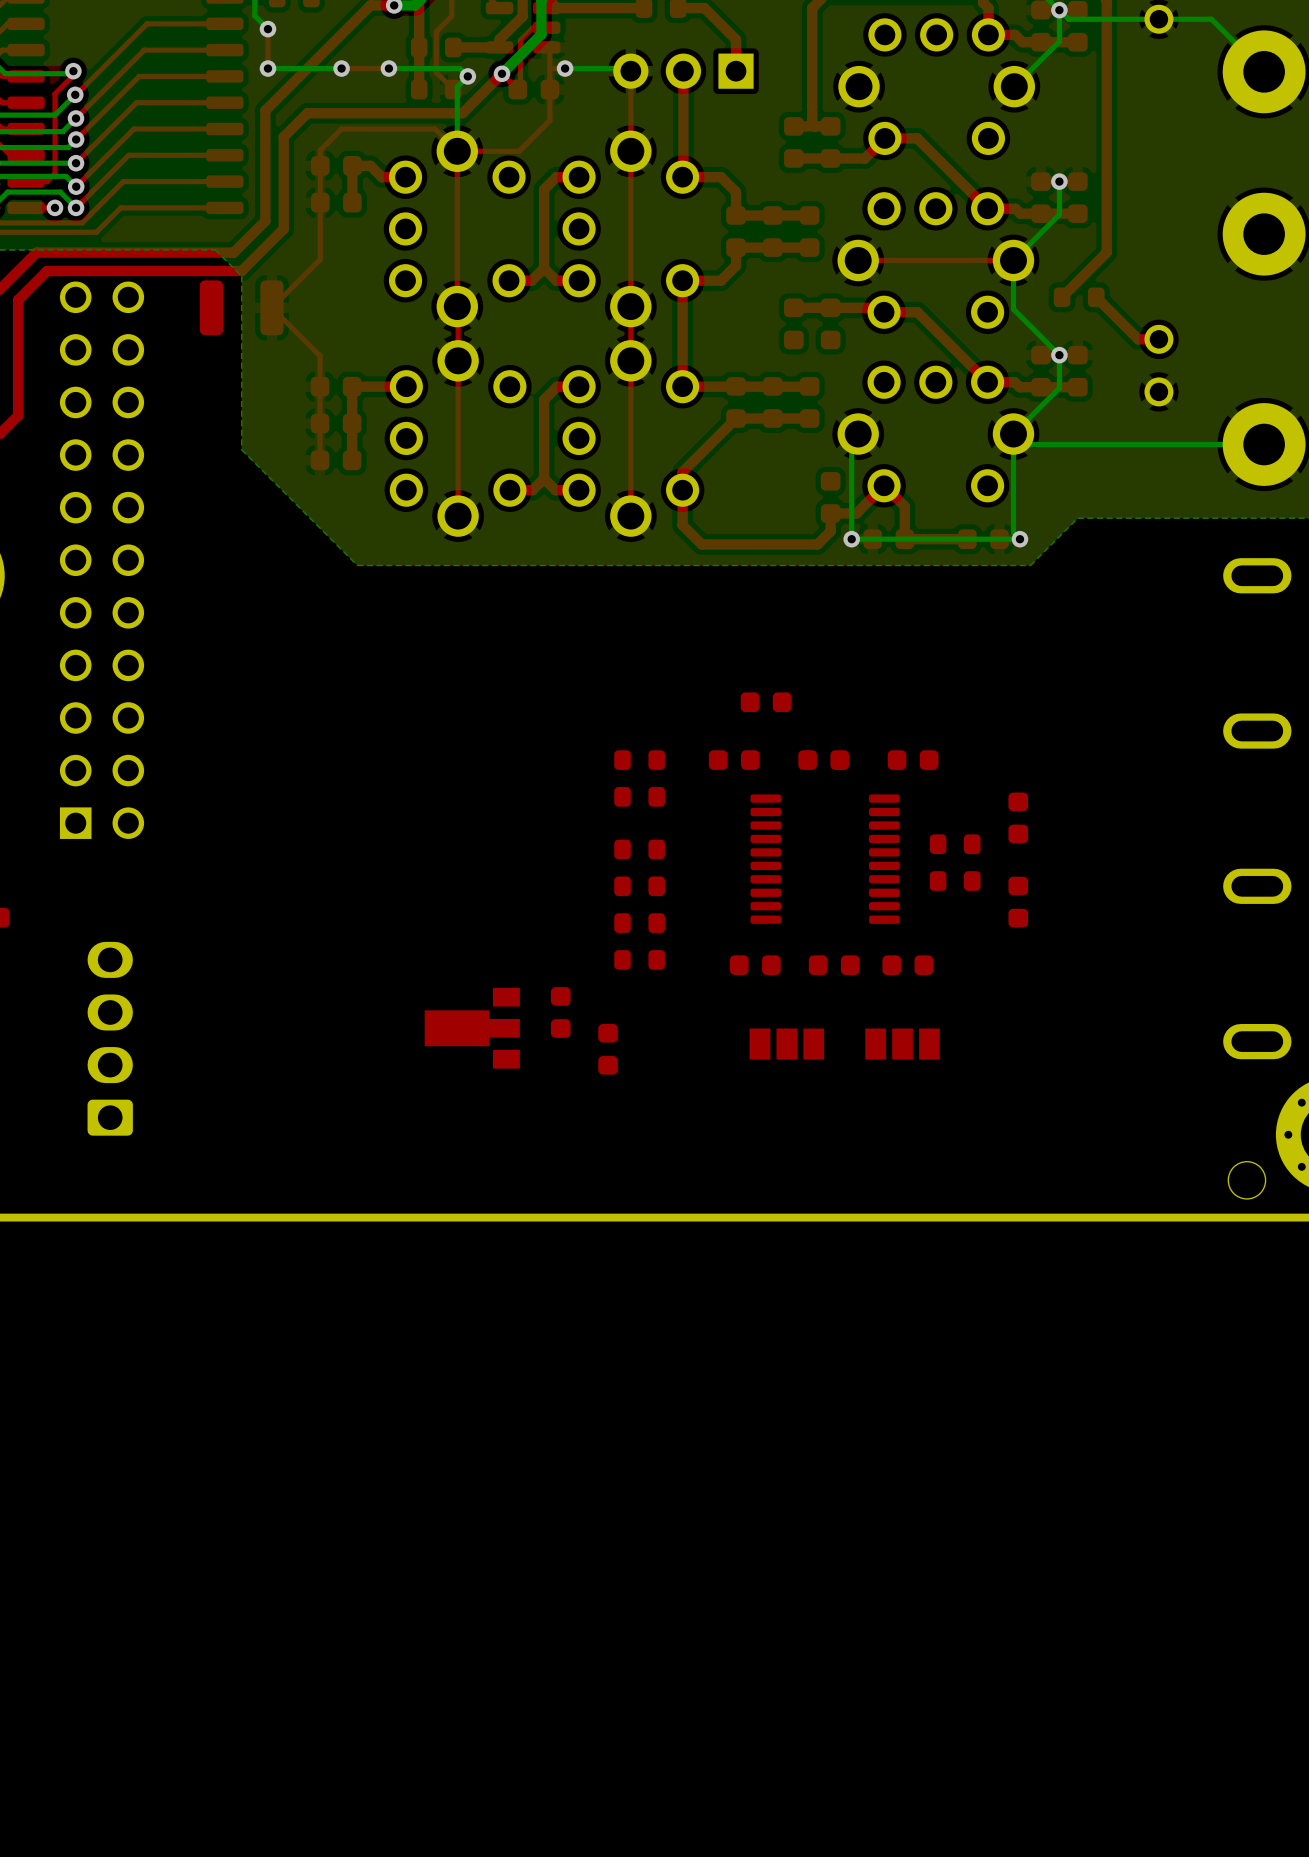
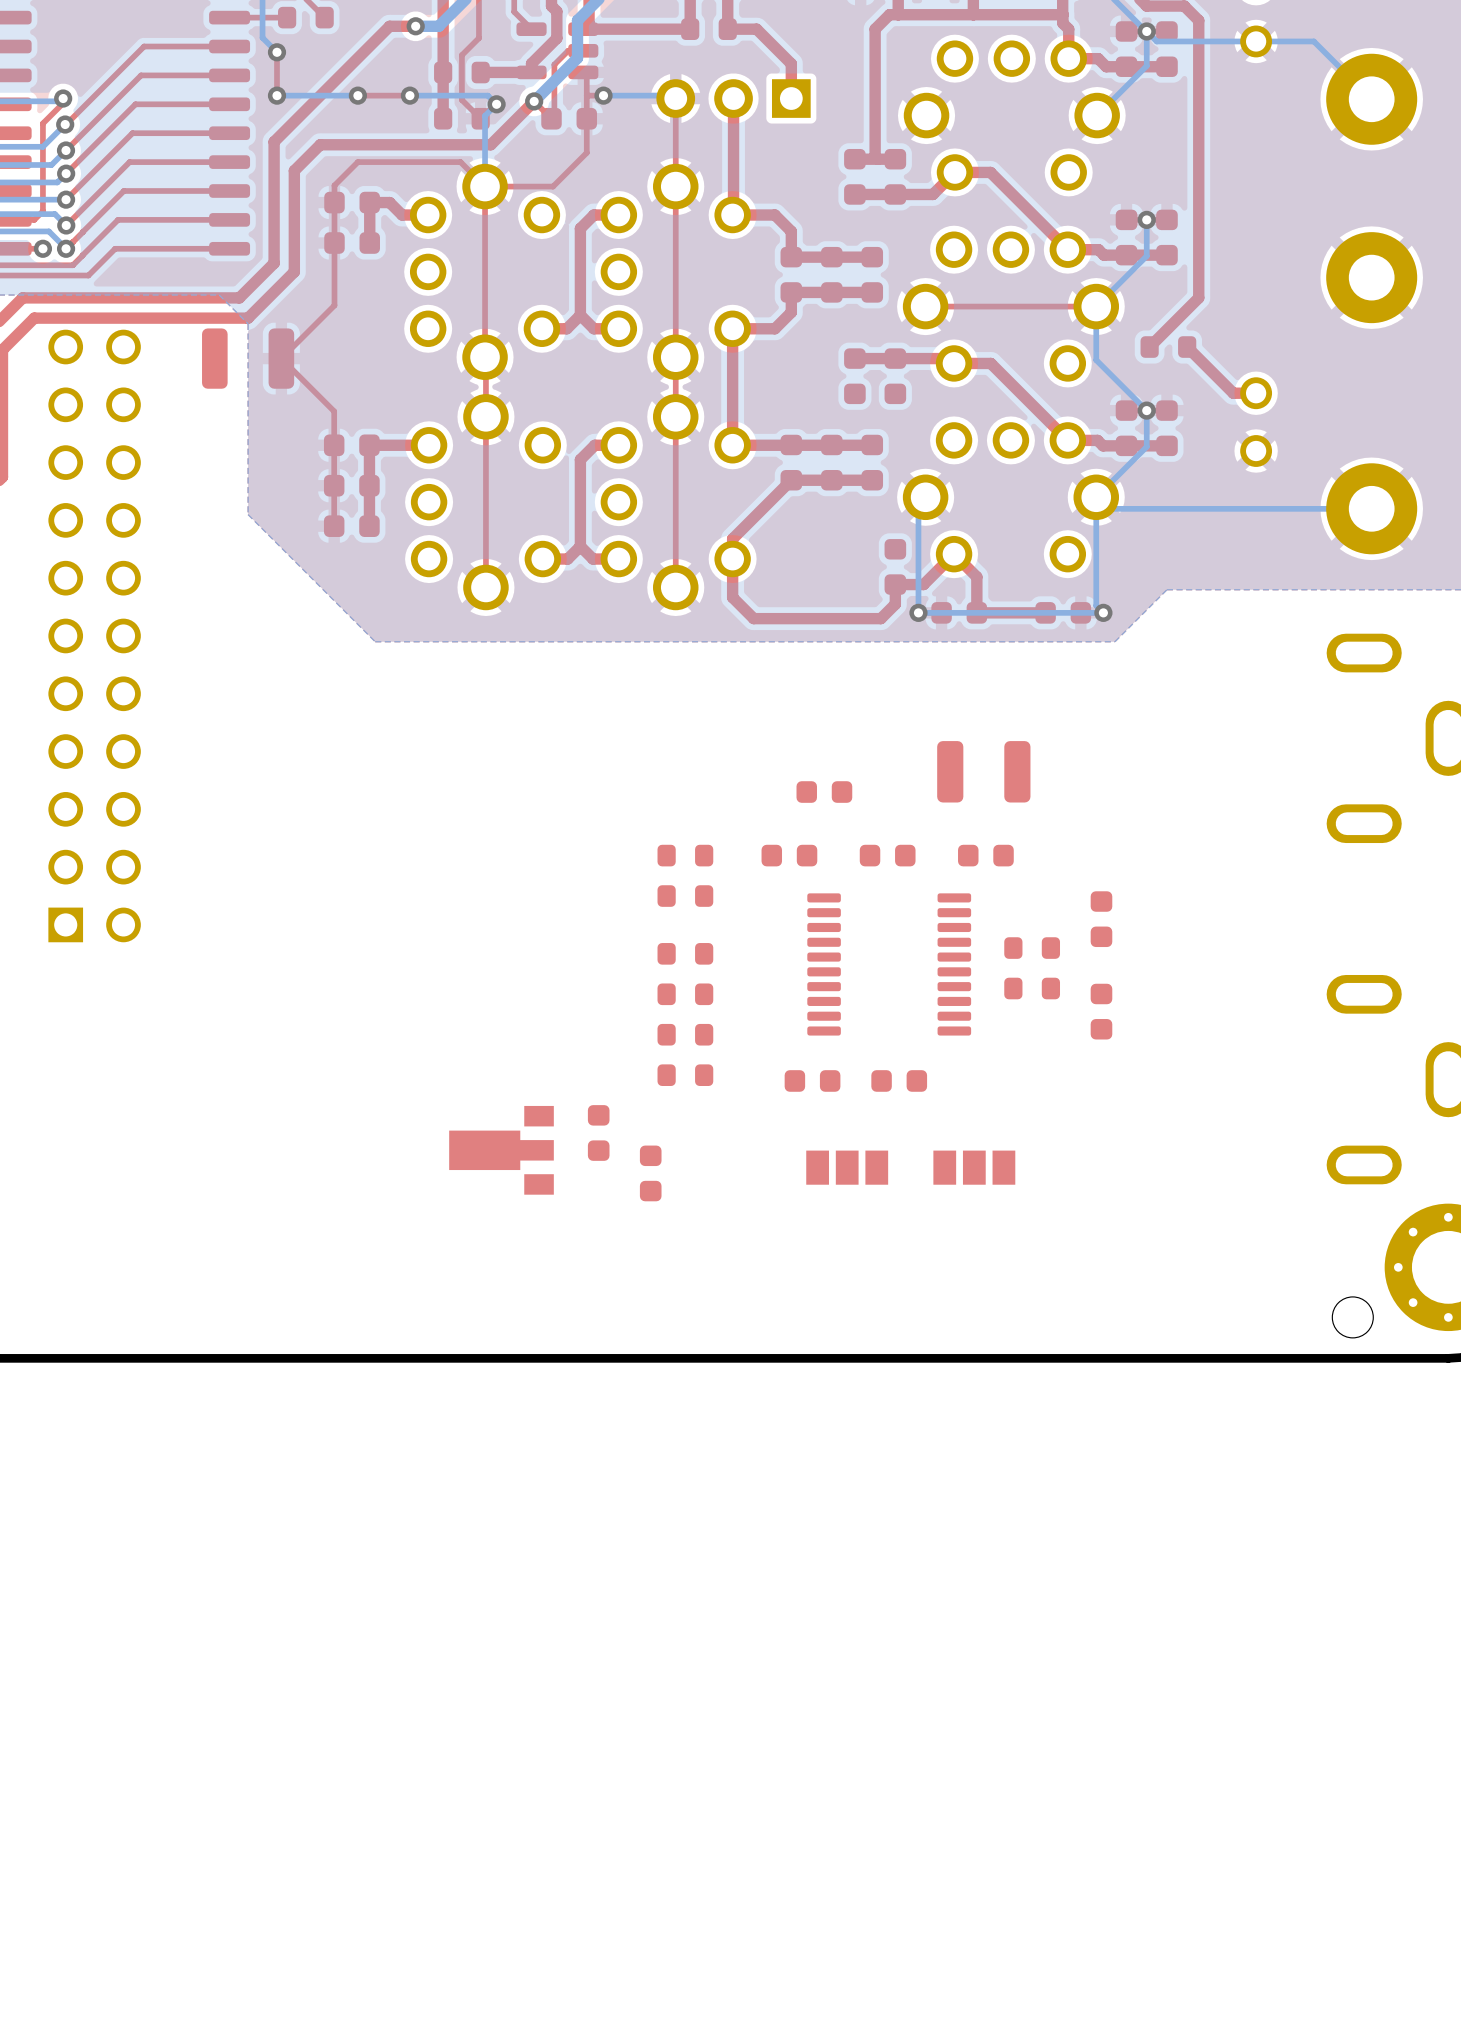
part: none -> (983, 771)
part: (907, 965) -> none
part: (110, 1038) -> none

